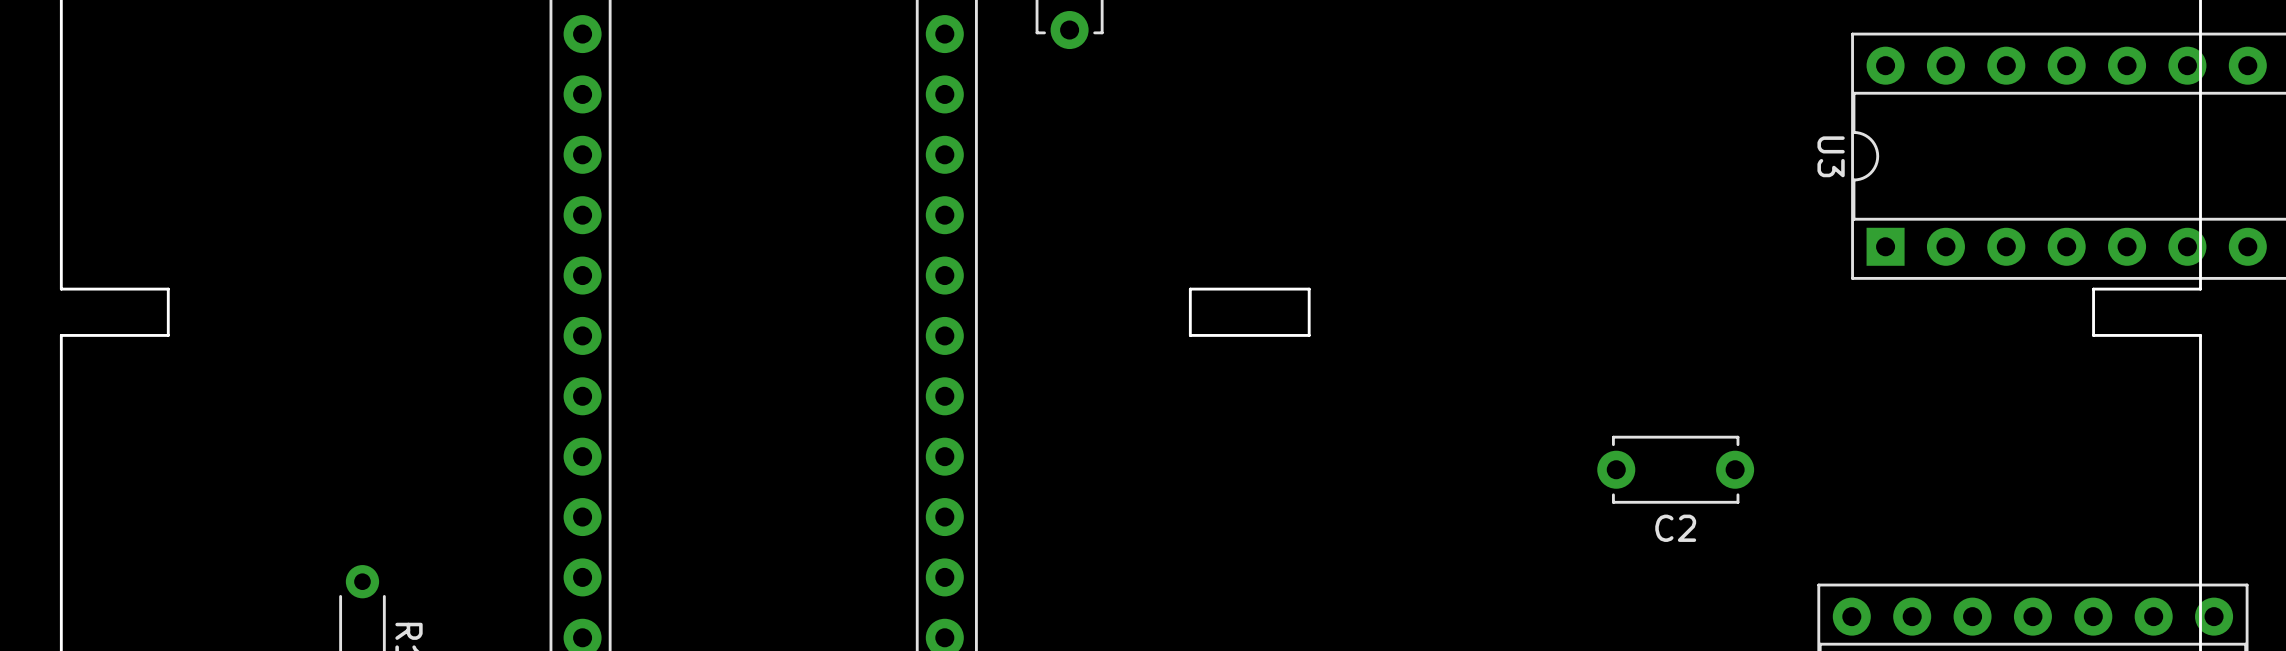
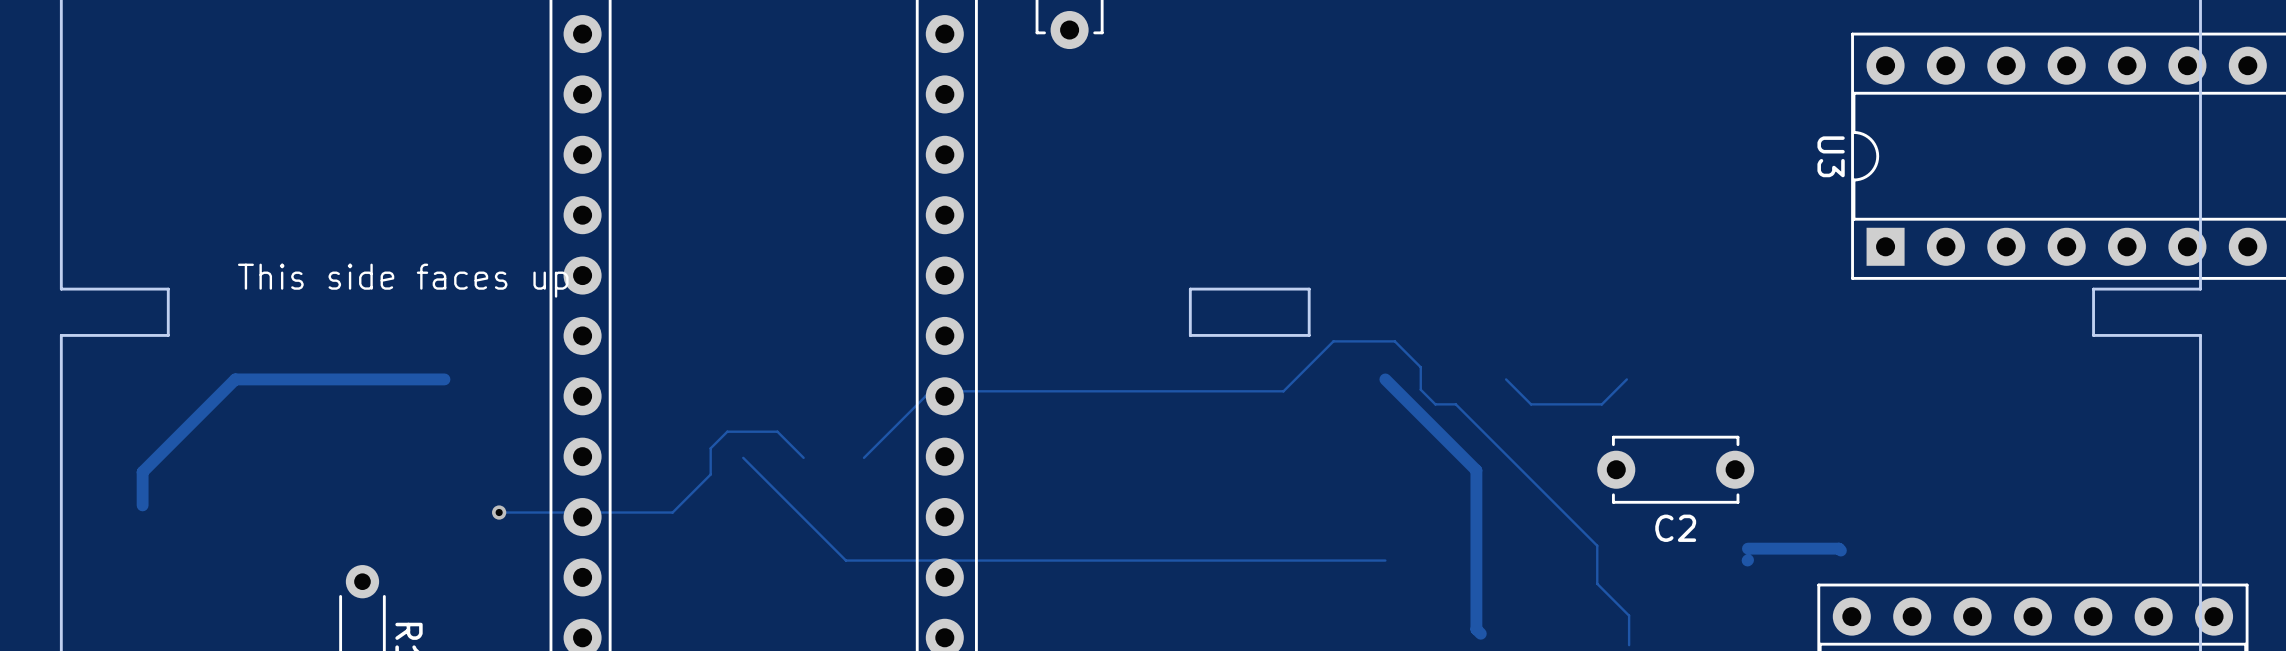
text: none -> This side faces up (403, 280)
track: none -> (444, 379) (235, 379) (142, 472) (142, 505)
track: none -> (1385, 379) (1476, 470) (1476, 629) (1480, 633)
track: none -> (1626, 379) (1601, 404) (1531, 404) (1506, 379)
track: none -> (743, 457) (845, 560) (1385, 560)
track: none -> (803, 457) (777, 431) (727, 431) (710, 448) (710, 474) (672, 512) (499, 512)
track: none -> (864, 457) (930, 391) (1283, 391) (1333, 341) (1394, 341) (1420, 367) (1420, 389) (1435, 404) (1455, 404) (1597, 545) (1597, 583) (1629, 615) (1629, 645)
via: none -> (499, 512)
track: none -> (1747, 548) (1838, 548) (1840, 550)
track: none -> (1748, 560) (1747, 560)

